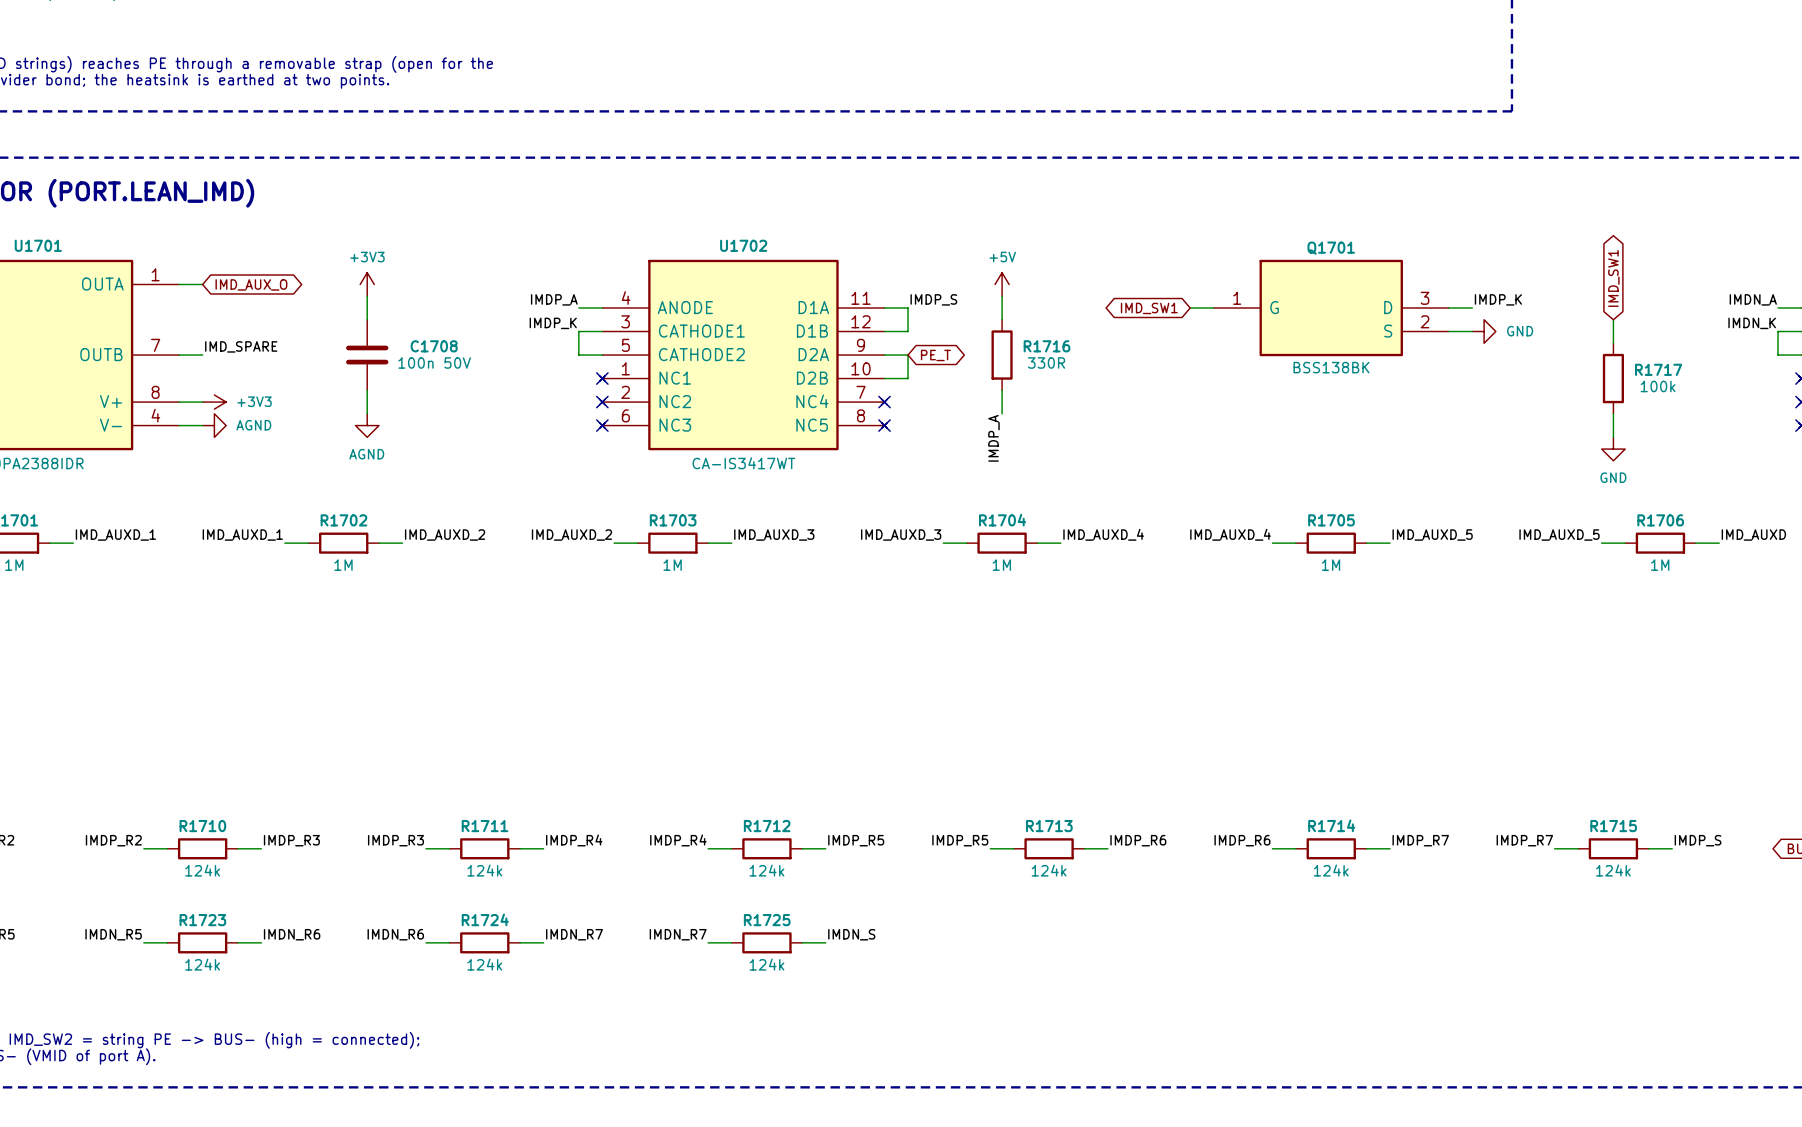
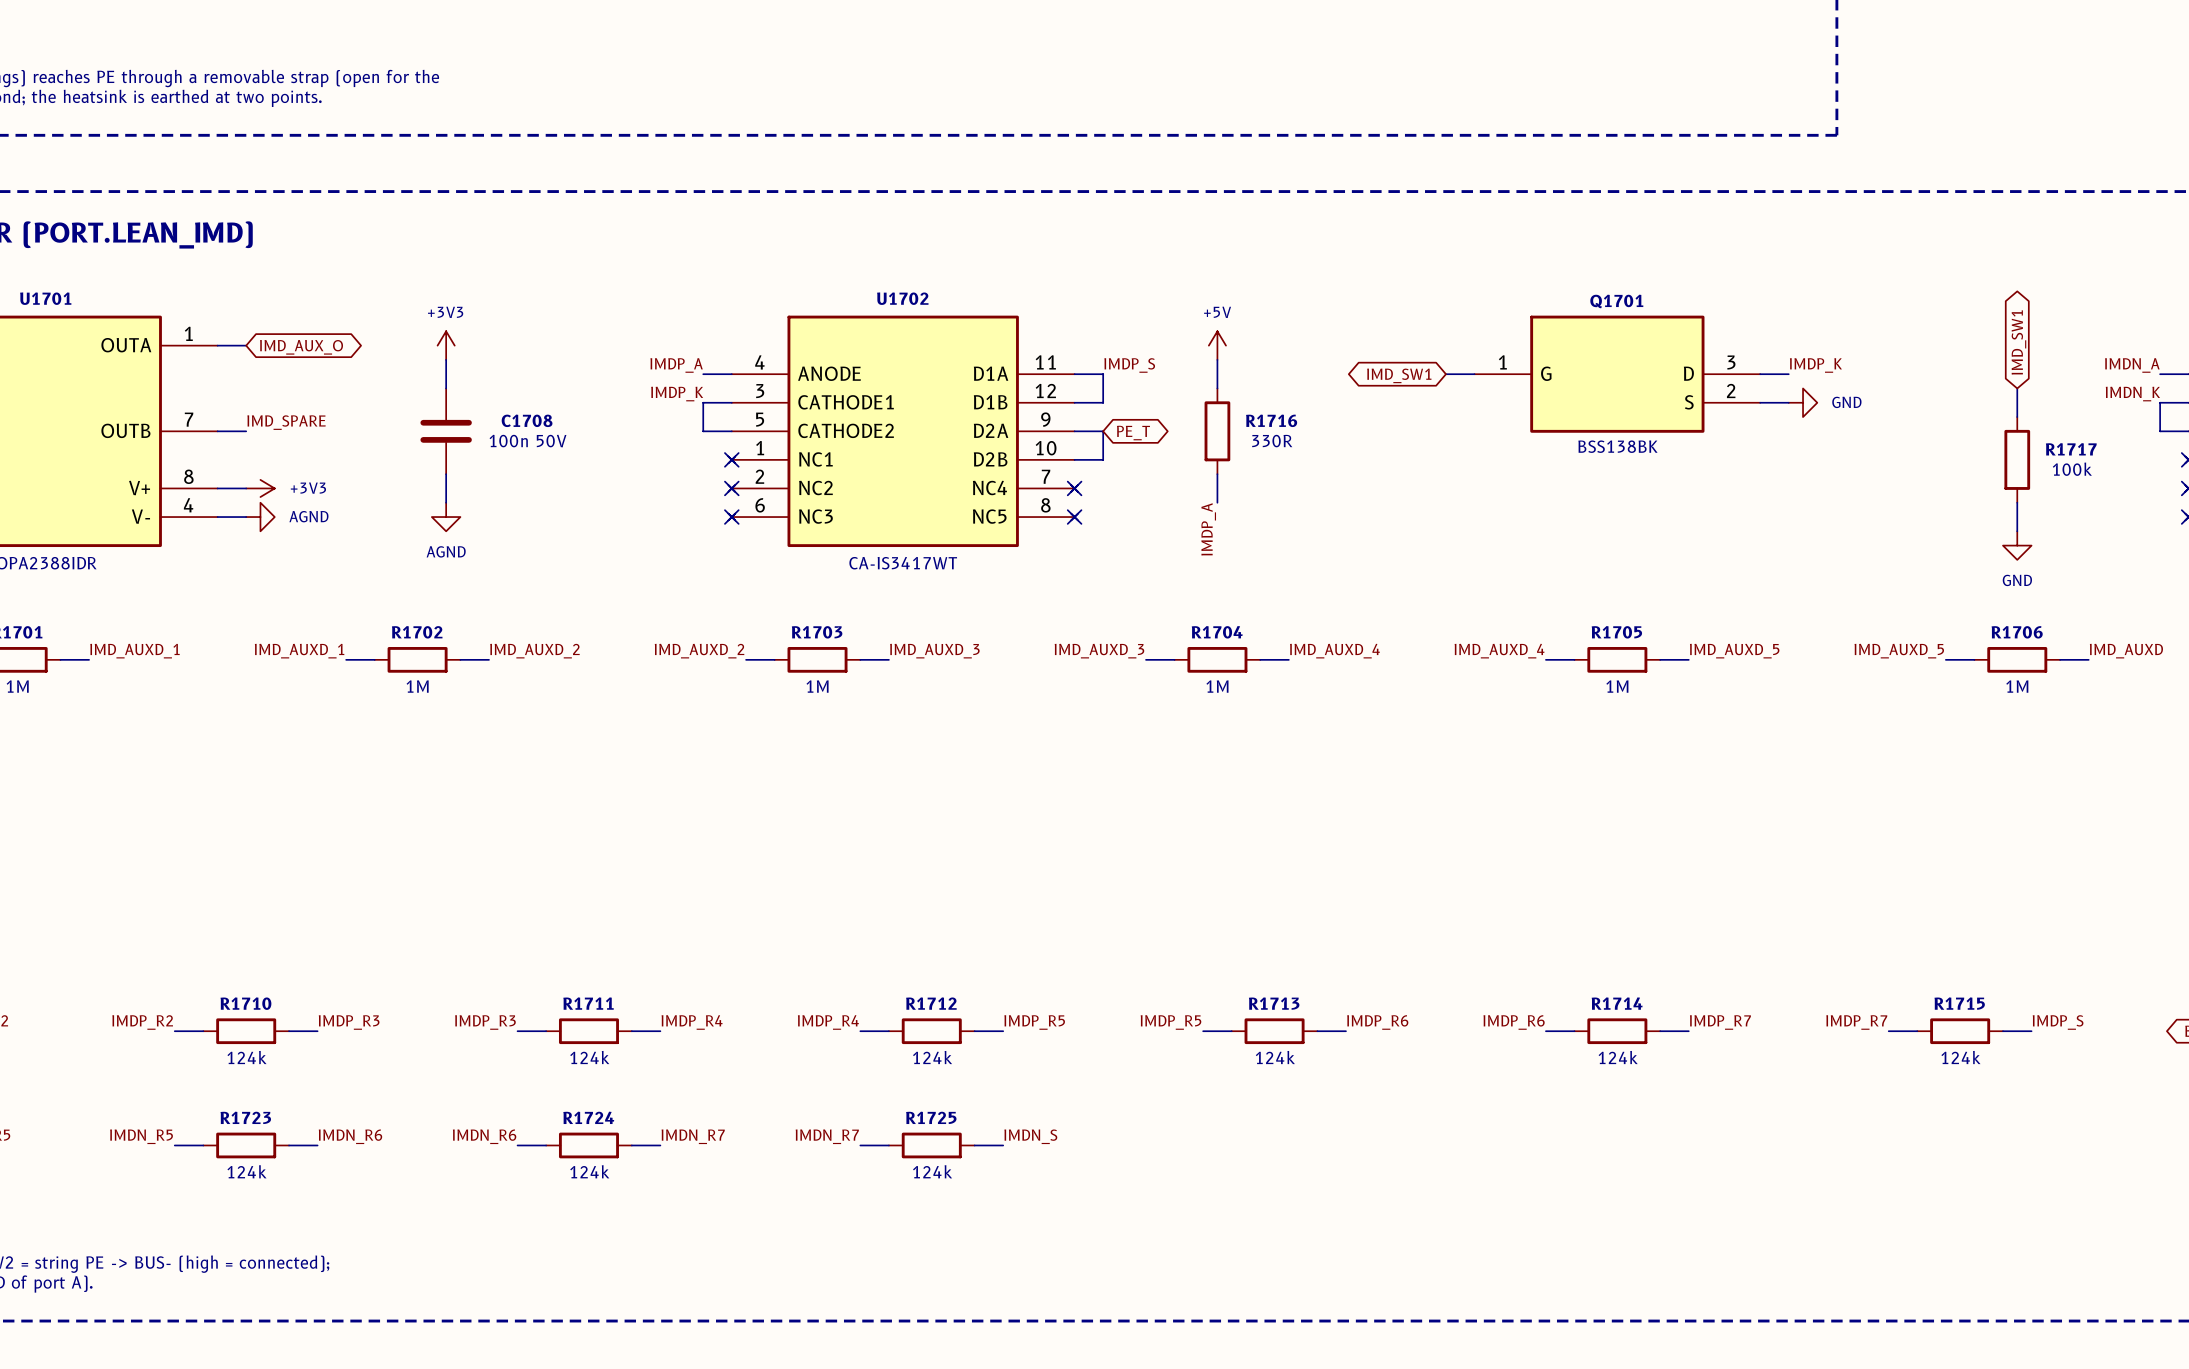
global label position: IMD_SW1 (1613, 278) -> IMD_SW1 (2018, 342)
wire: (1613, 319) (1613, 343) -> (2017, 388) (2017, 417)
R1717 position: (1613, 378) -> (2017, 459)
wire: (1613, 413) (1613, 437) -> (2017, 502) (2017, 531)
power symbol position: GND (1613, 449) -> GND (2017, 545)

